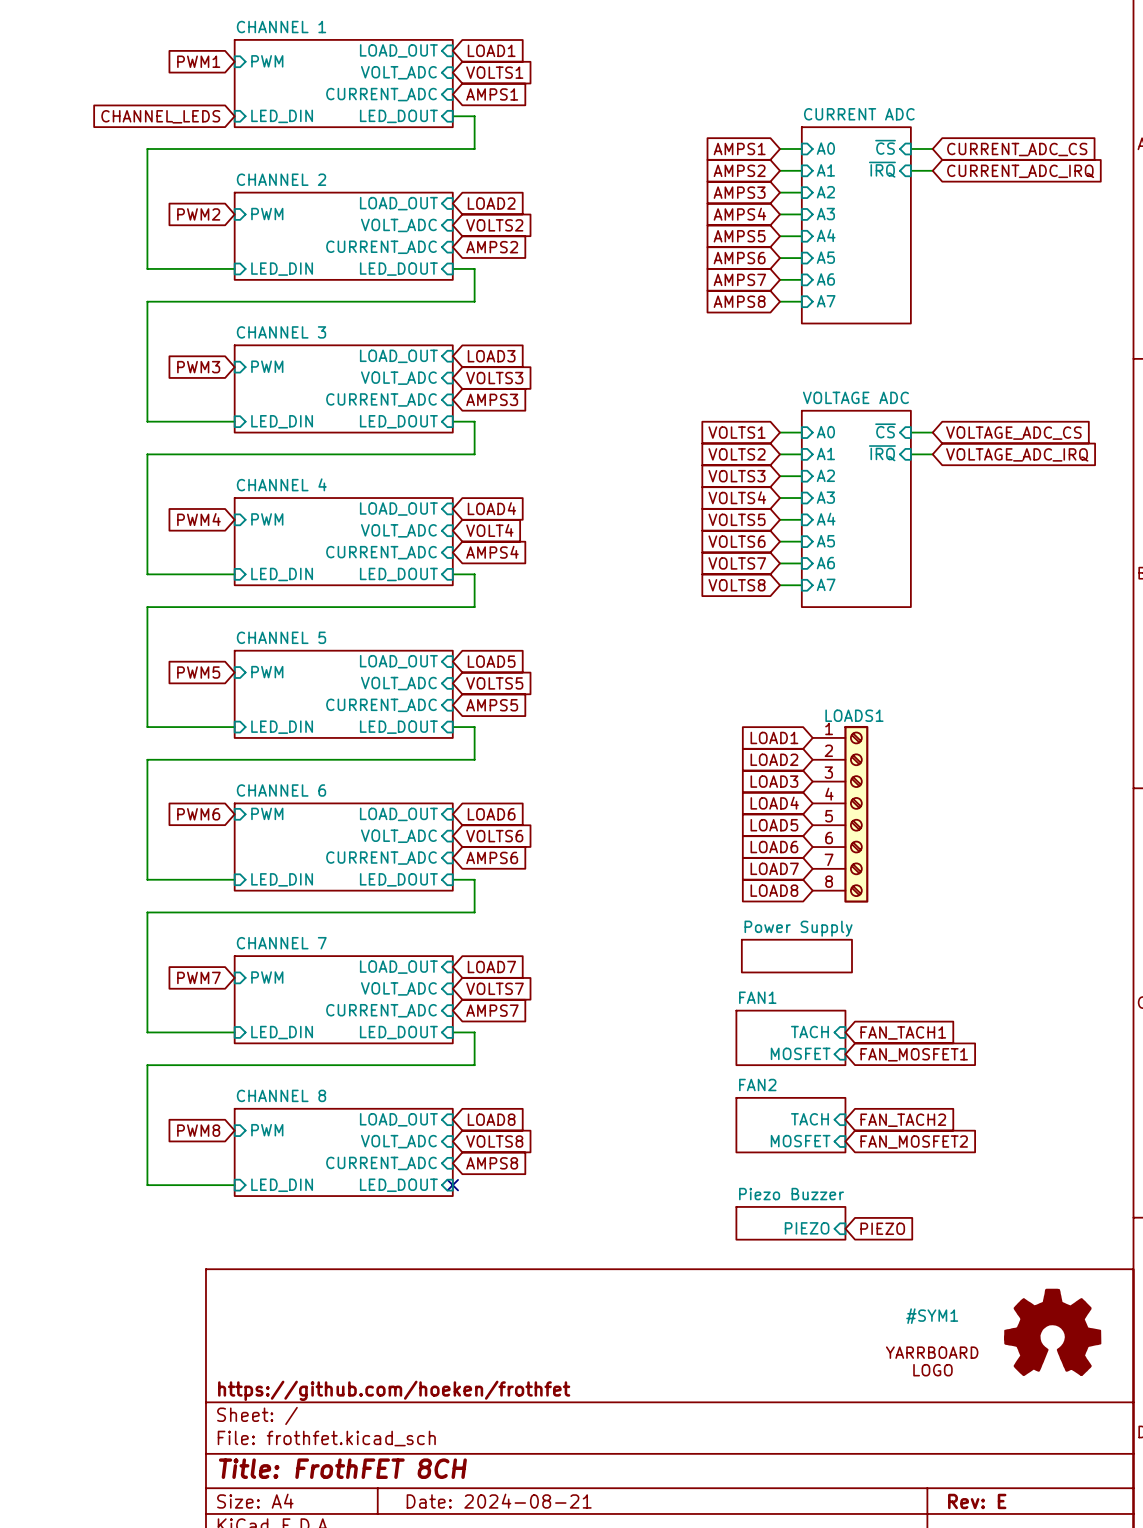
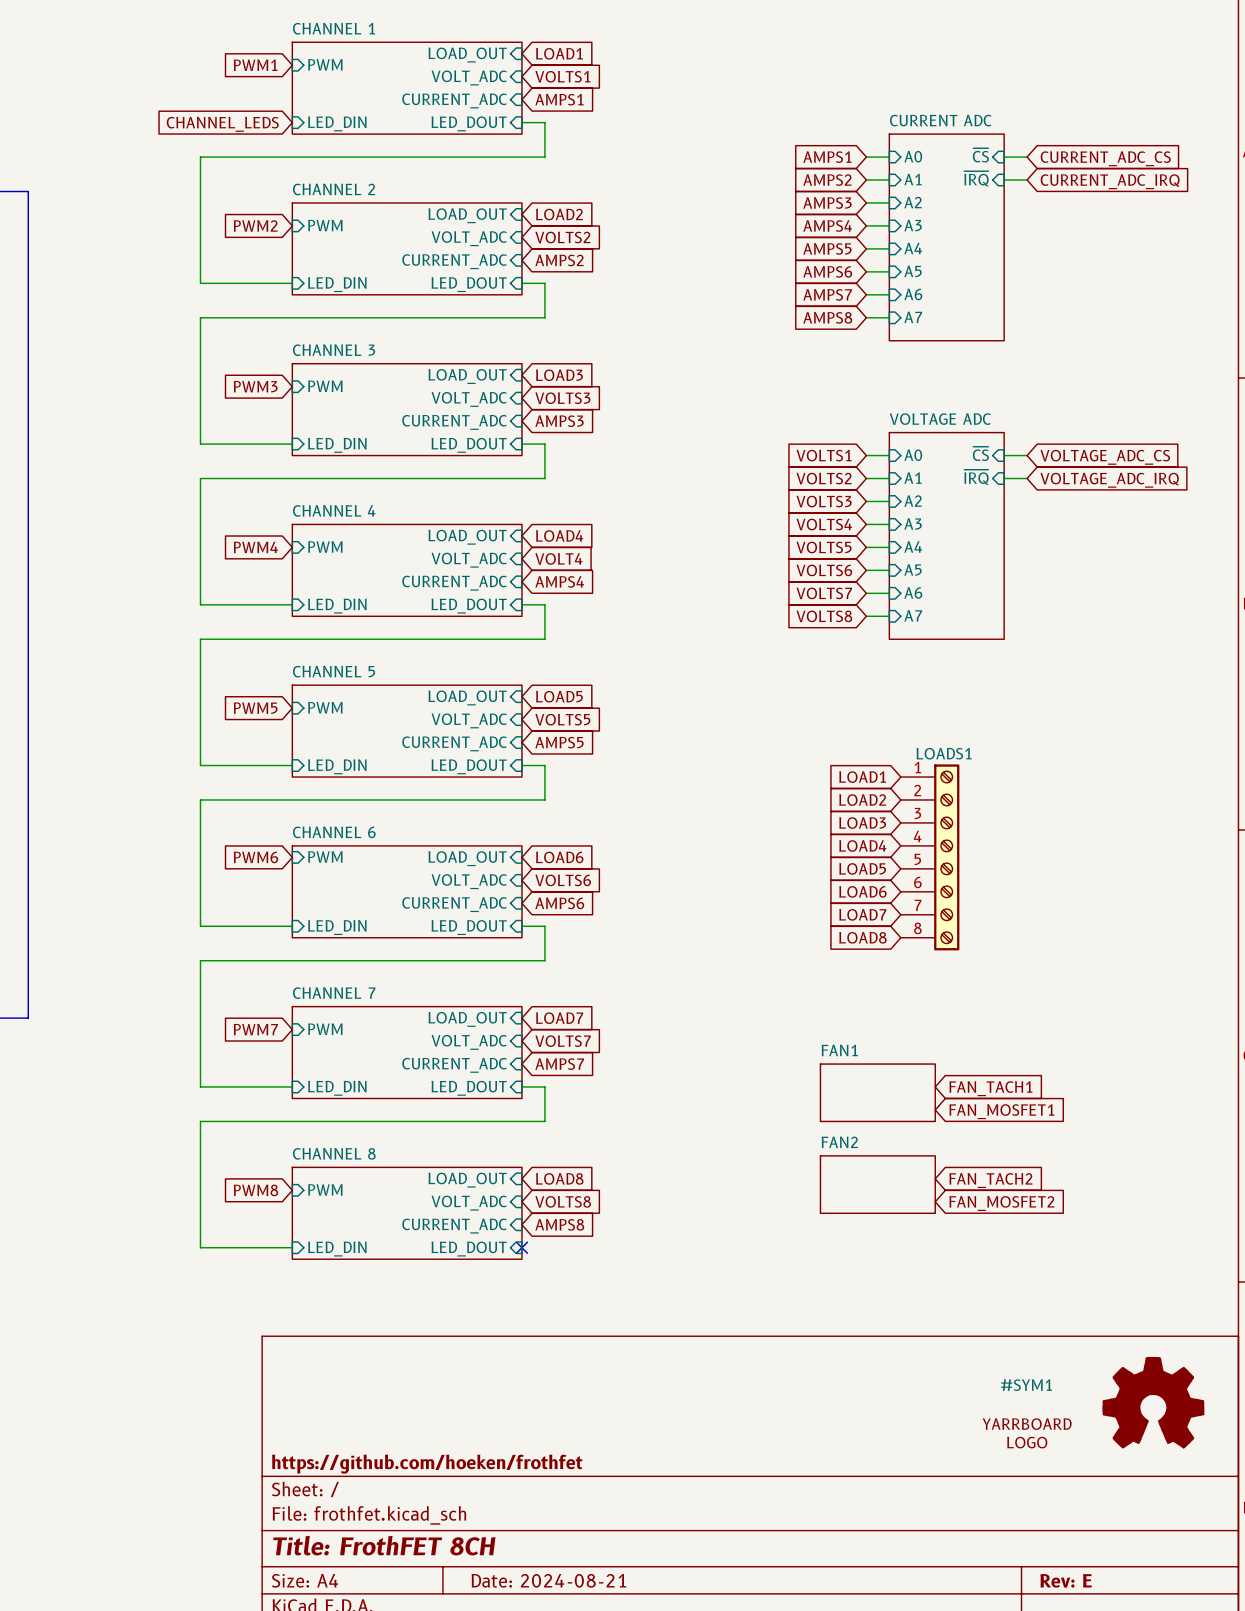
sheet Power Supply: (796, 956) -> none
sheet pin: TACH (809, 1032) -> none
sheet pin: MOSFET (800, 1053) -> none
sheet pin: TACH (809, 1119) -> none
sheet pin: MOSFET (800, 1141) -> none
sheet Piezo Buzzer: (790, 1223) -> none
sheet pin: PIEZO (807, 1228) -> none
global label: PIEZO (882, 1228) -> none

